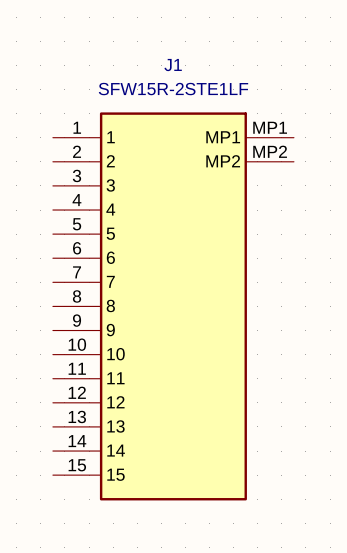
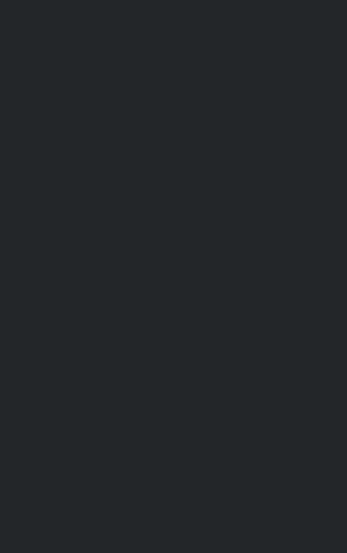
J1: SFW15R-2STE1LF (173, 306) -> none

